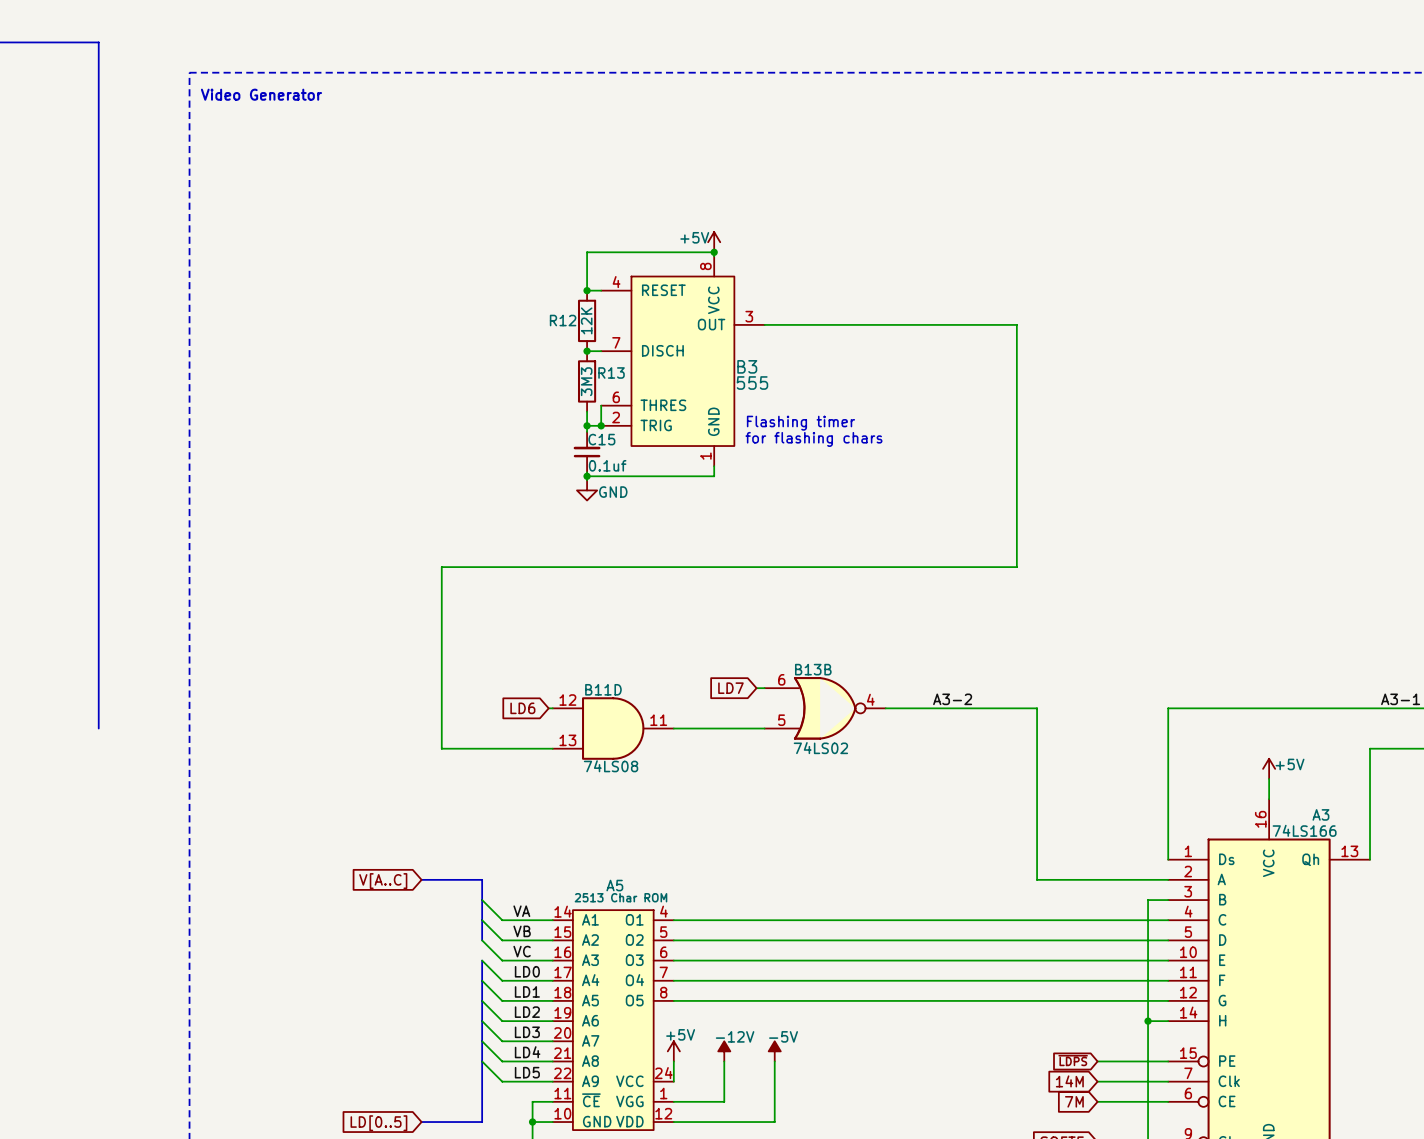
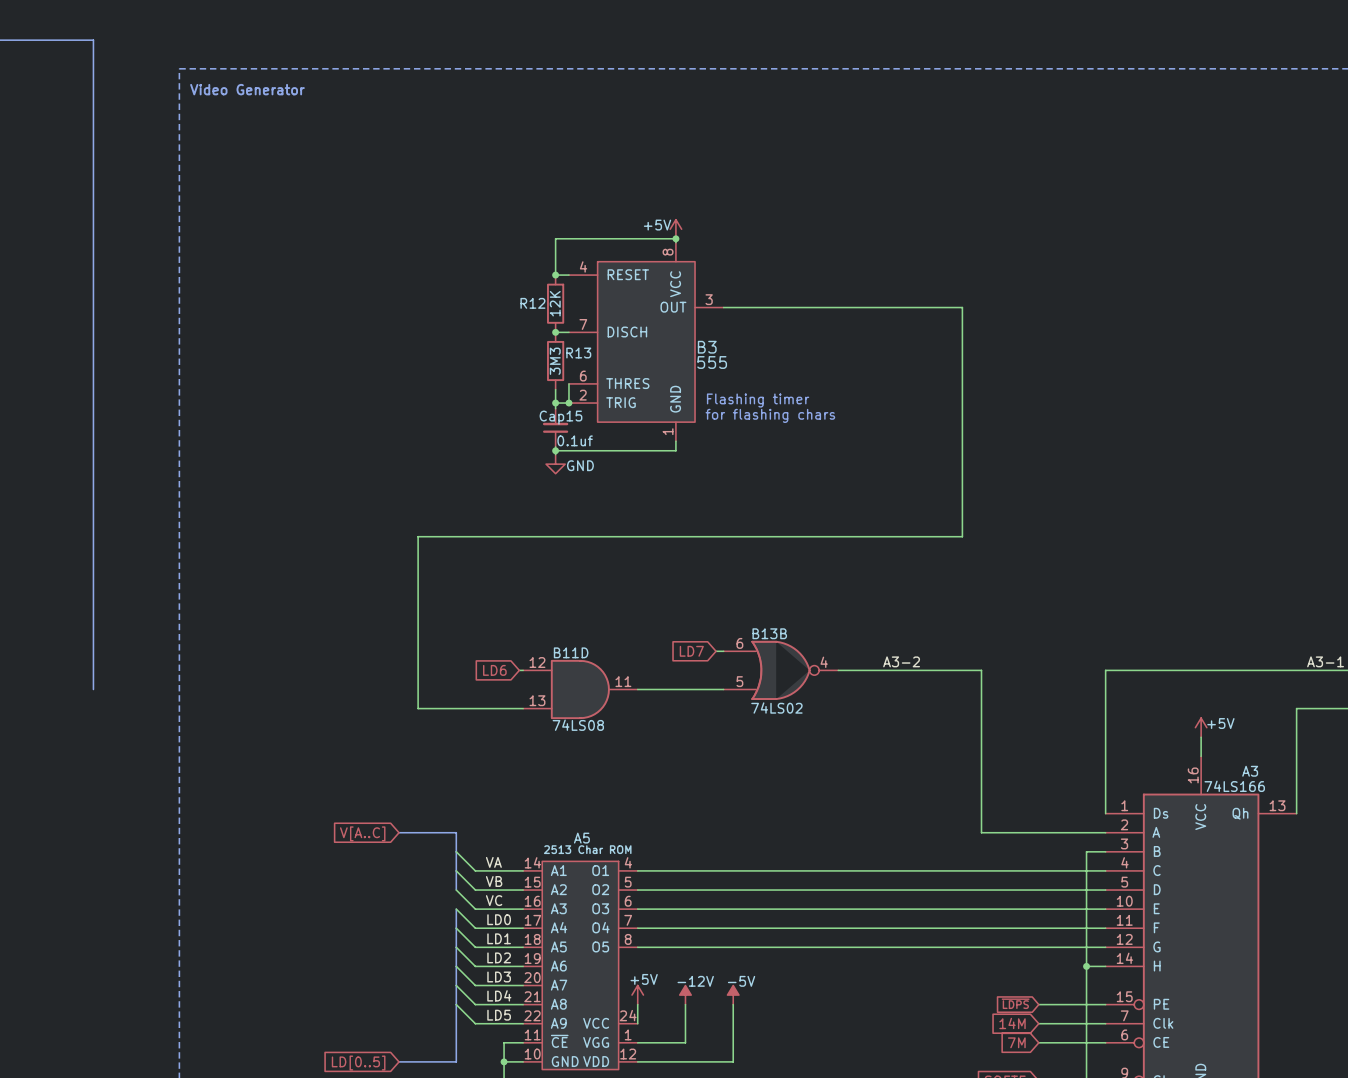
C15 name: C15 (601, 439) -> Cap15 (560, 417)

